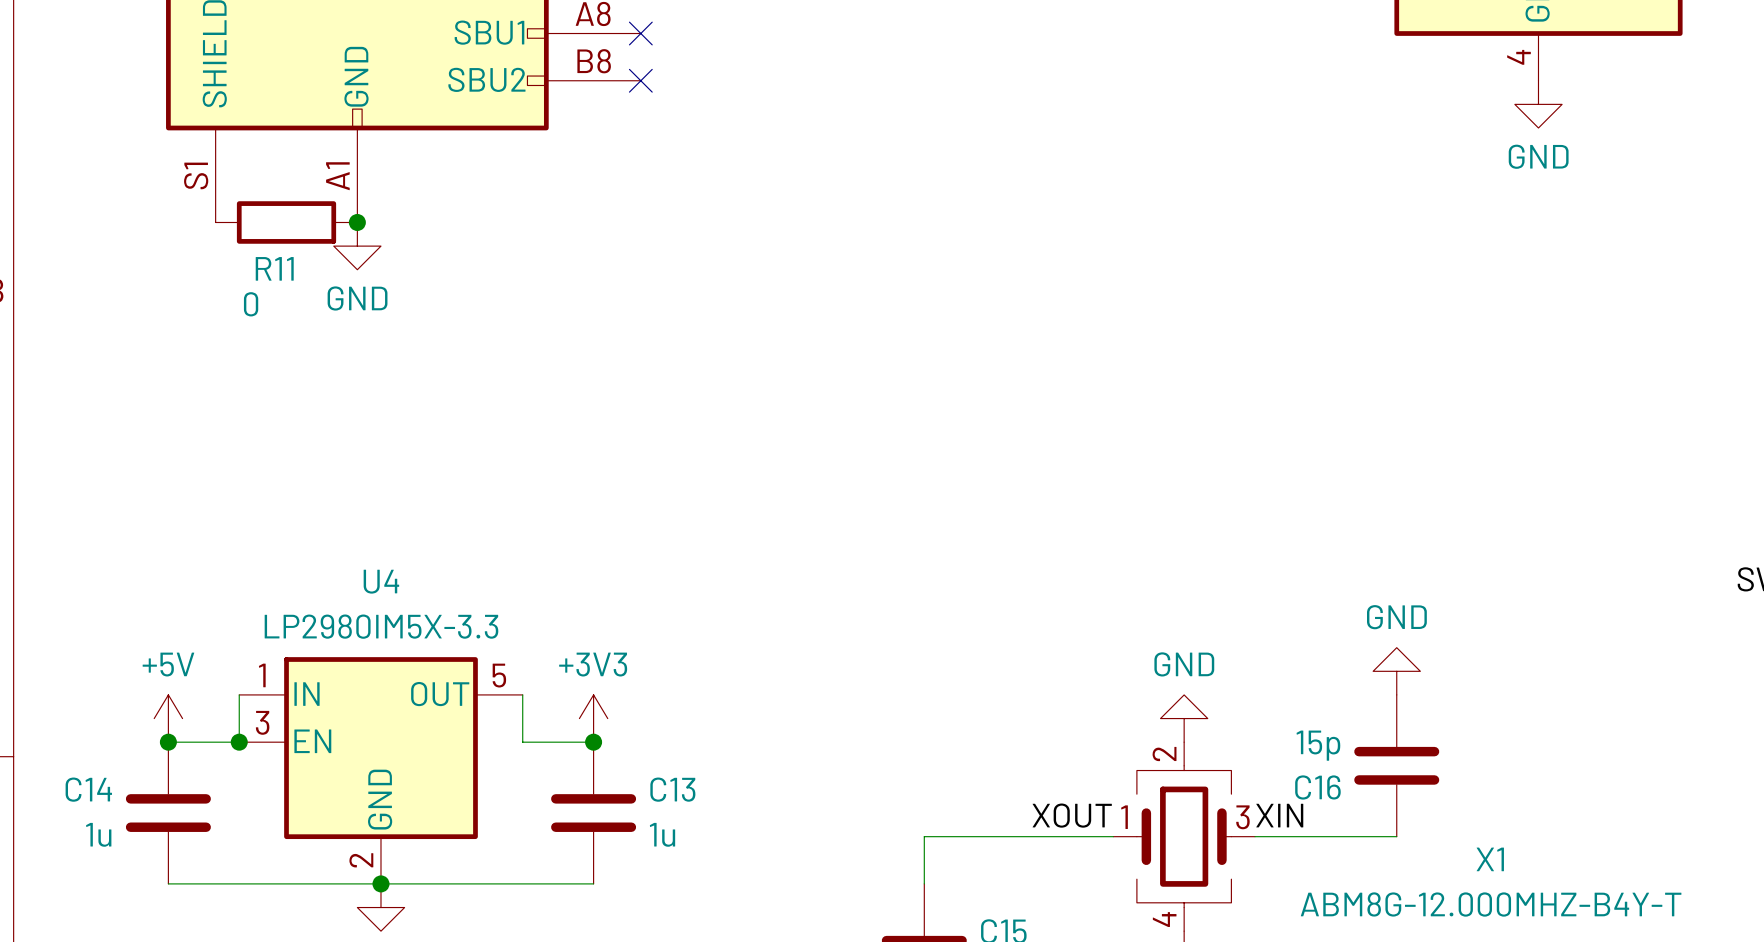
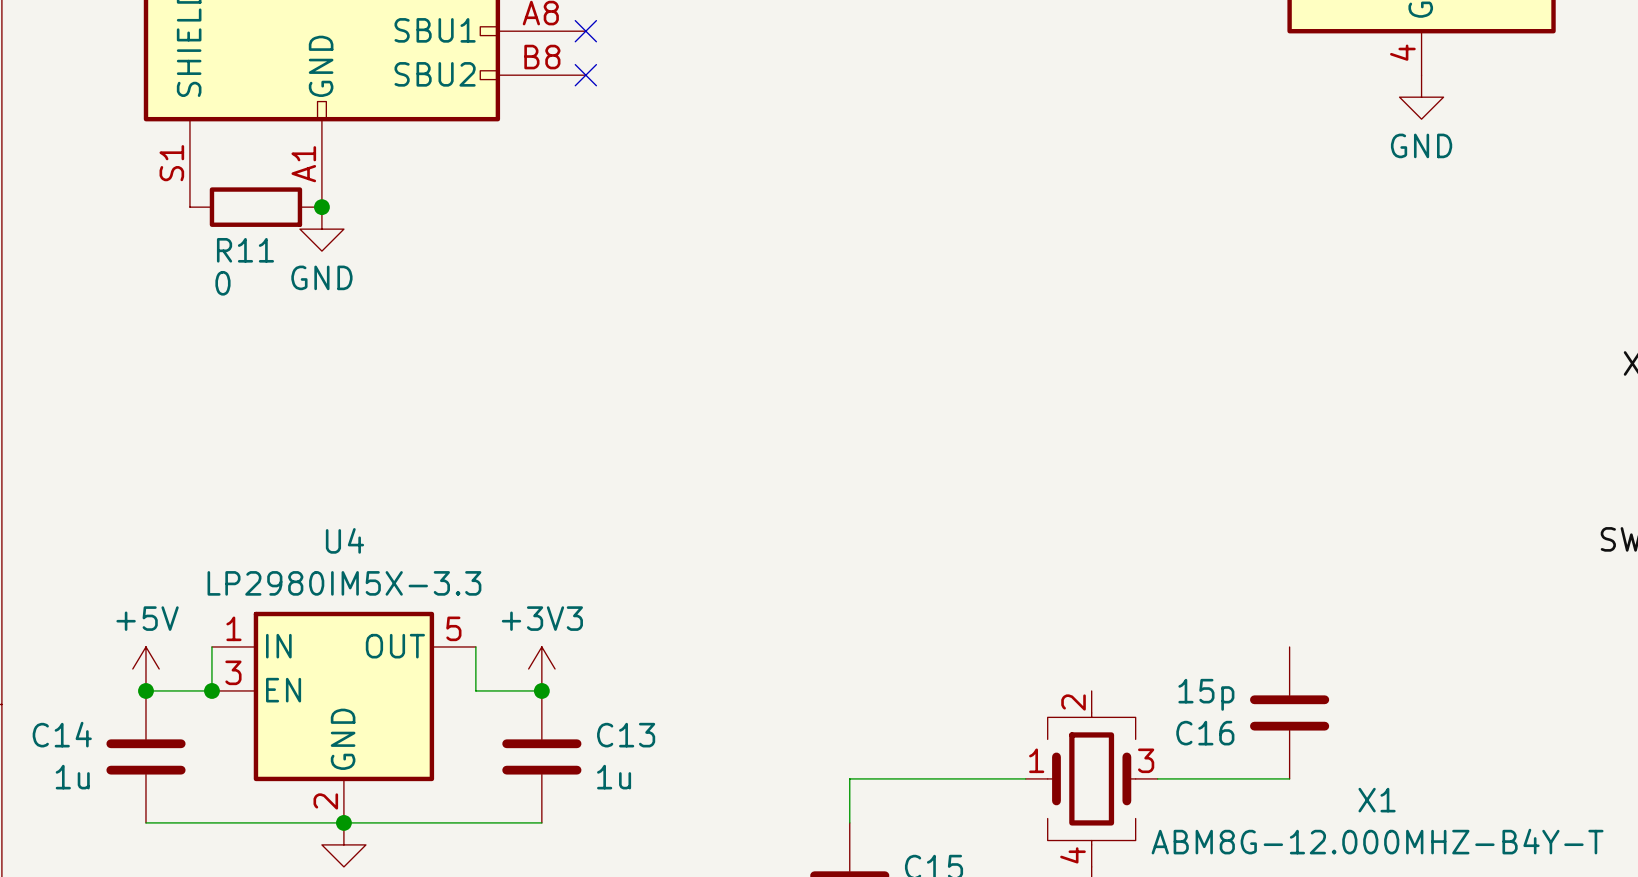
power symbol: GND (1396, 671) -> none
power symbol: GND (1184, 718) -> none
label: XOUT (1072, 815) -> none
label: XIN (1279, 815) -> none

